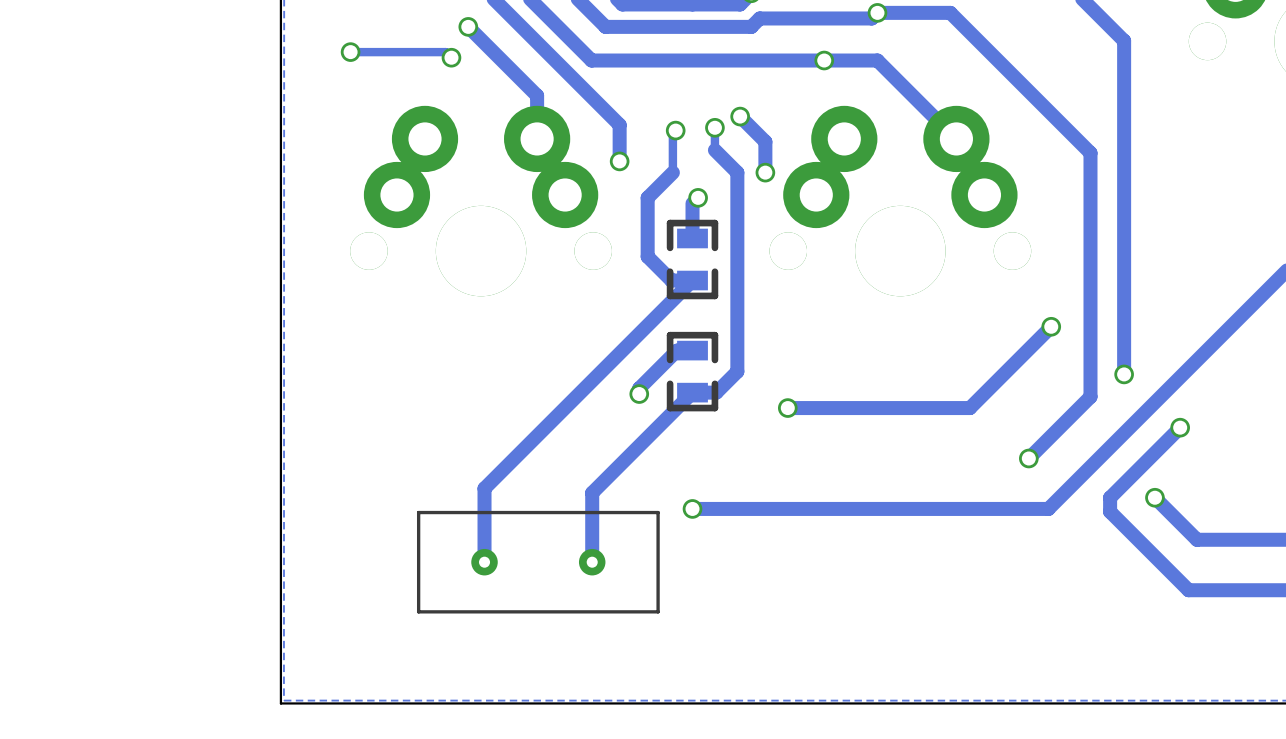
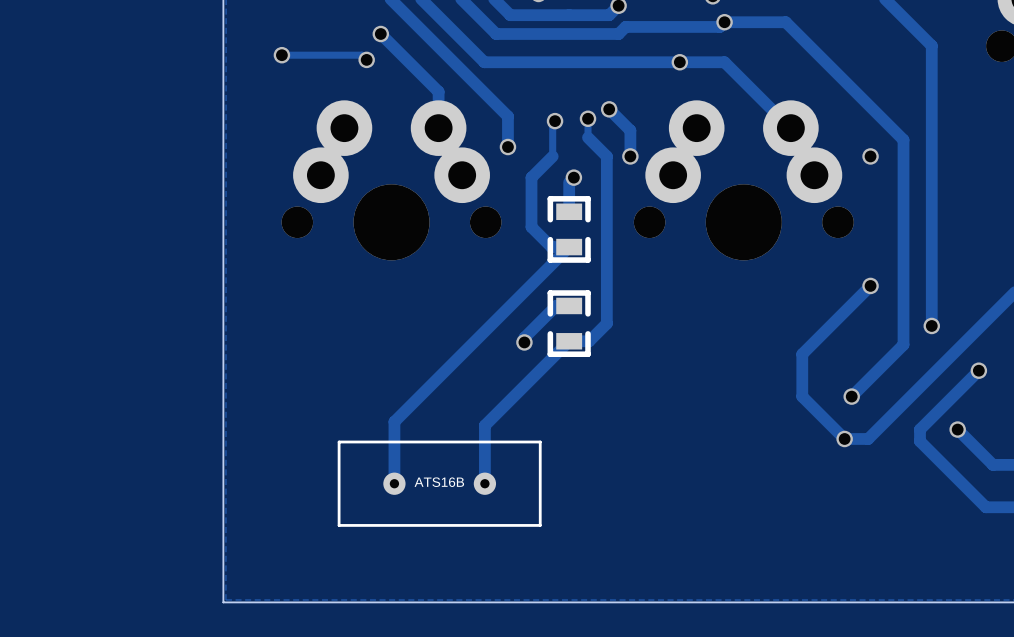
via: none -> (870, 156)
via: (787, 408) -> none
track: (969, 408) (787, 408) -> (802, 354) (802, 396) (844, 438)
via: (692, 508) -> none
track: (1020, 508) (692, 508) -> none
via: none -> (844, 438)
part value: none -> ATS16B (439, 482)

